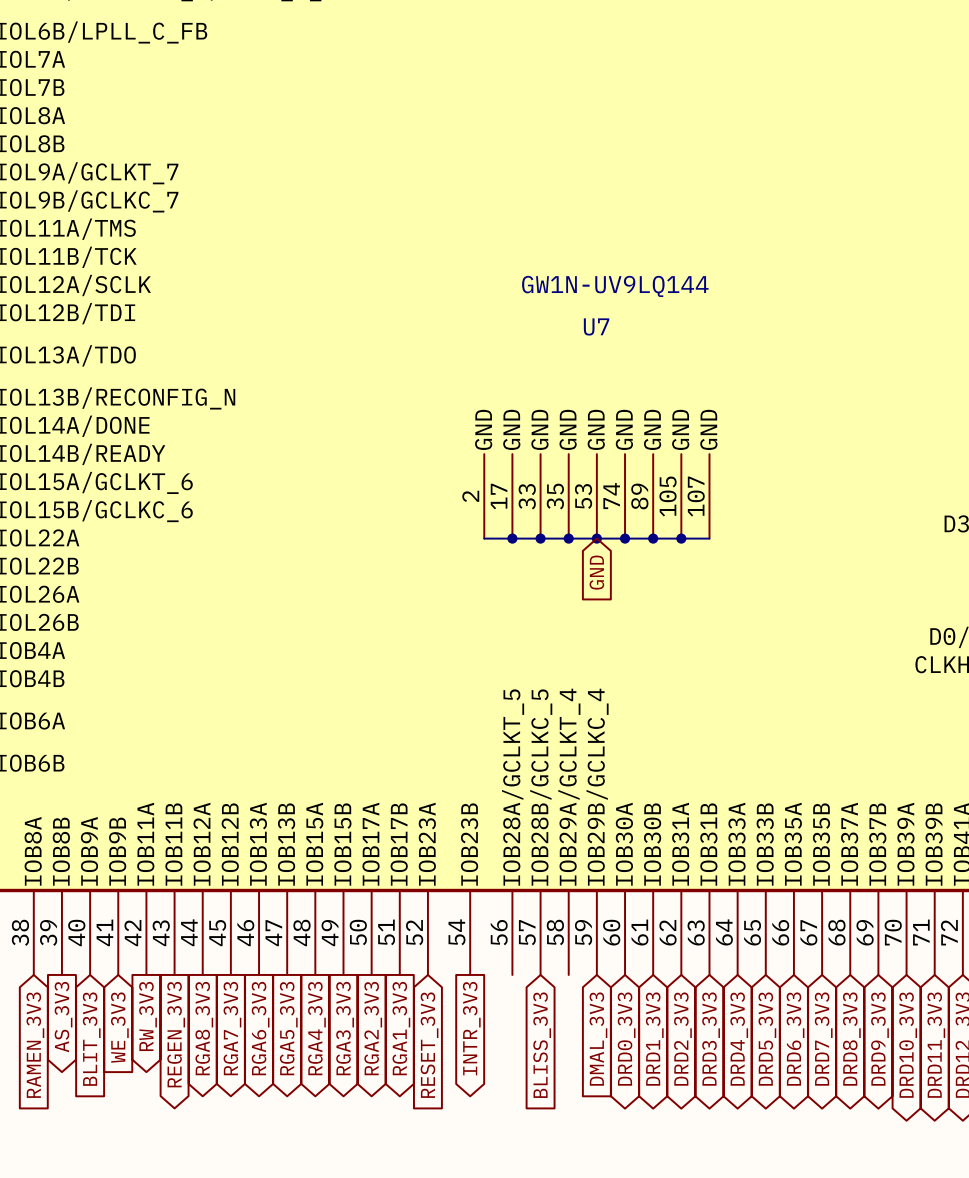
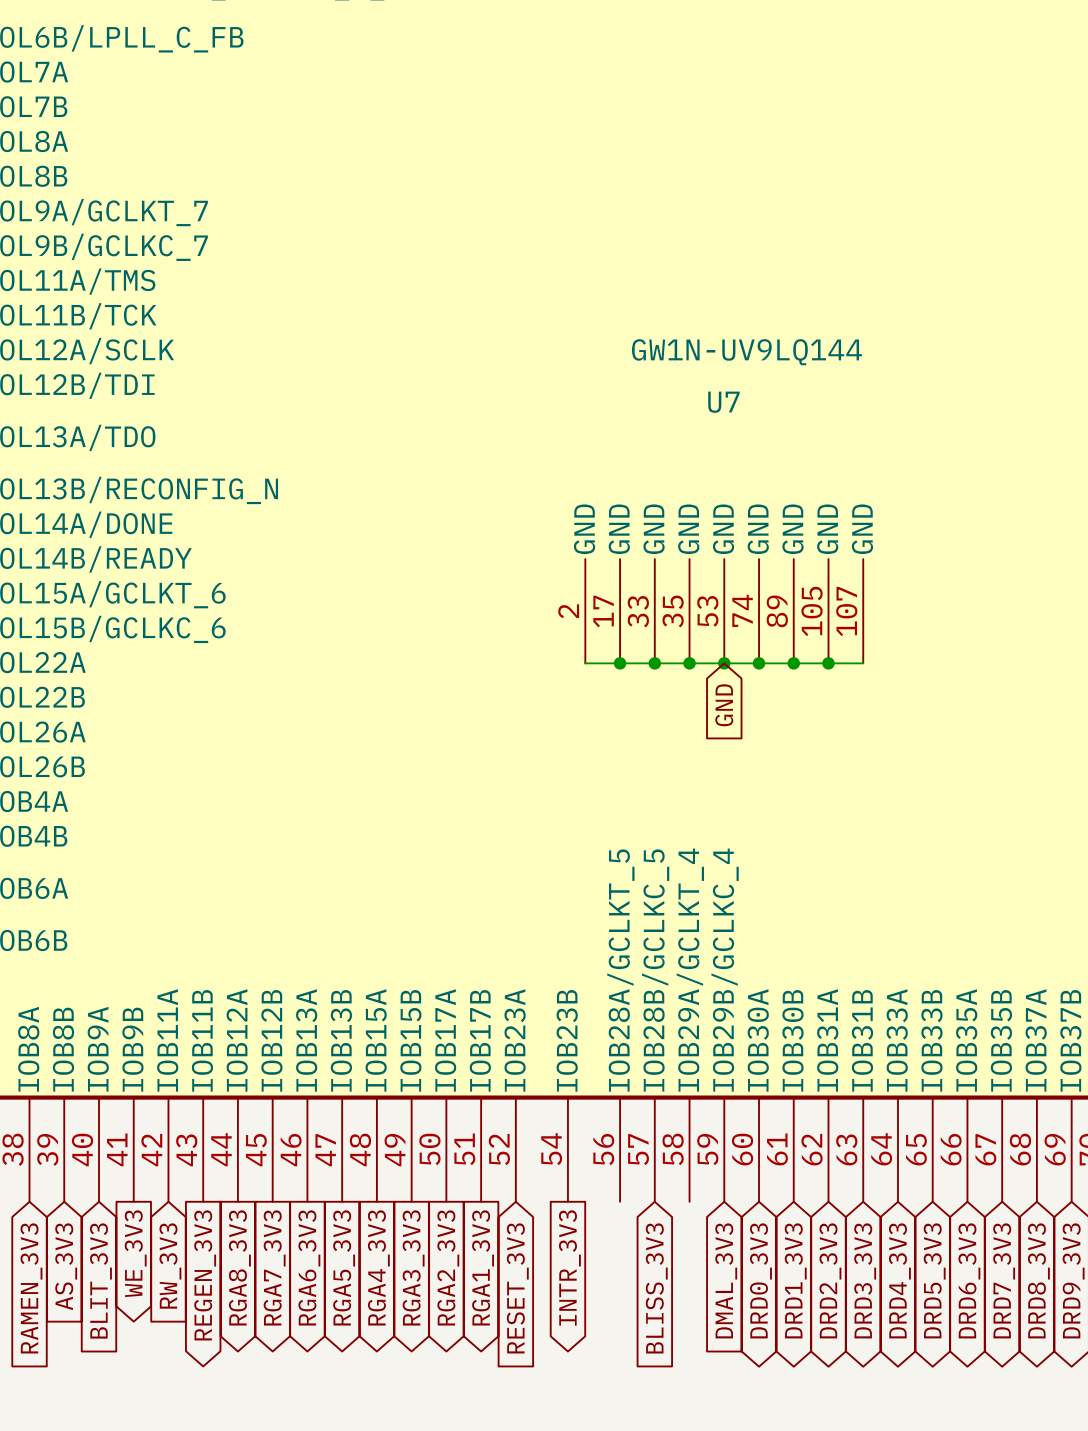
global label shape: output (148, 1016) -> input (170, 1266)
global label shape: output (63, 1017) -> input (66, 1266)
global label shape: input (119, 1027) -> output (135, 1253)

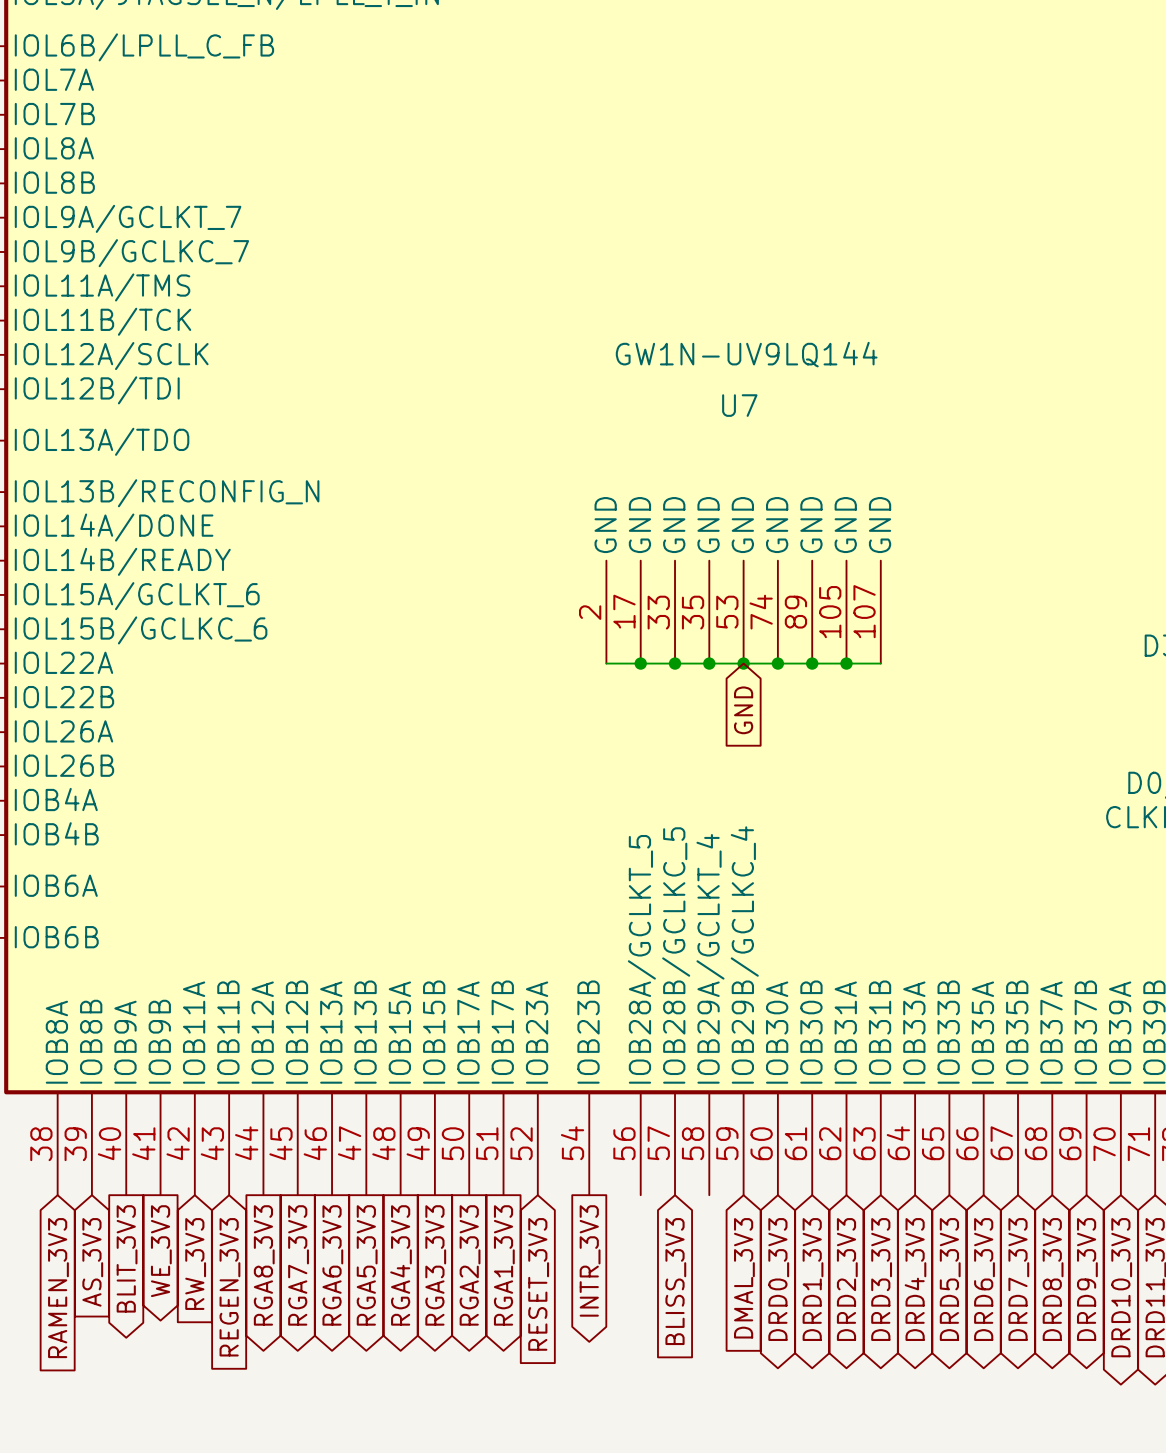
global label shape: output (205, 1275) -> input (229, 1287)
global label shape: input (100, 1280) -> output (127, 1258)

